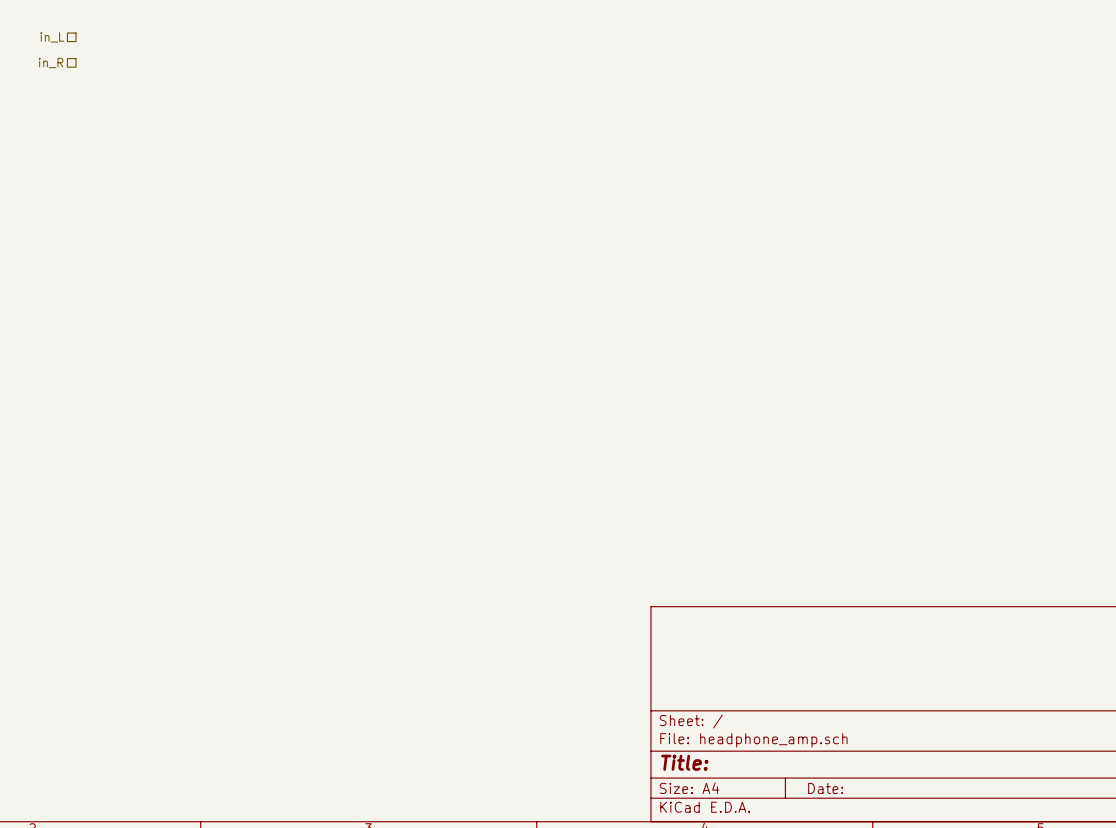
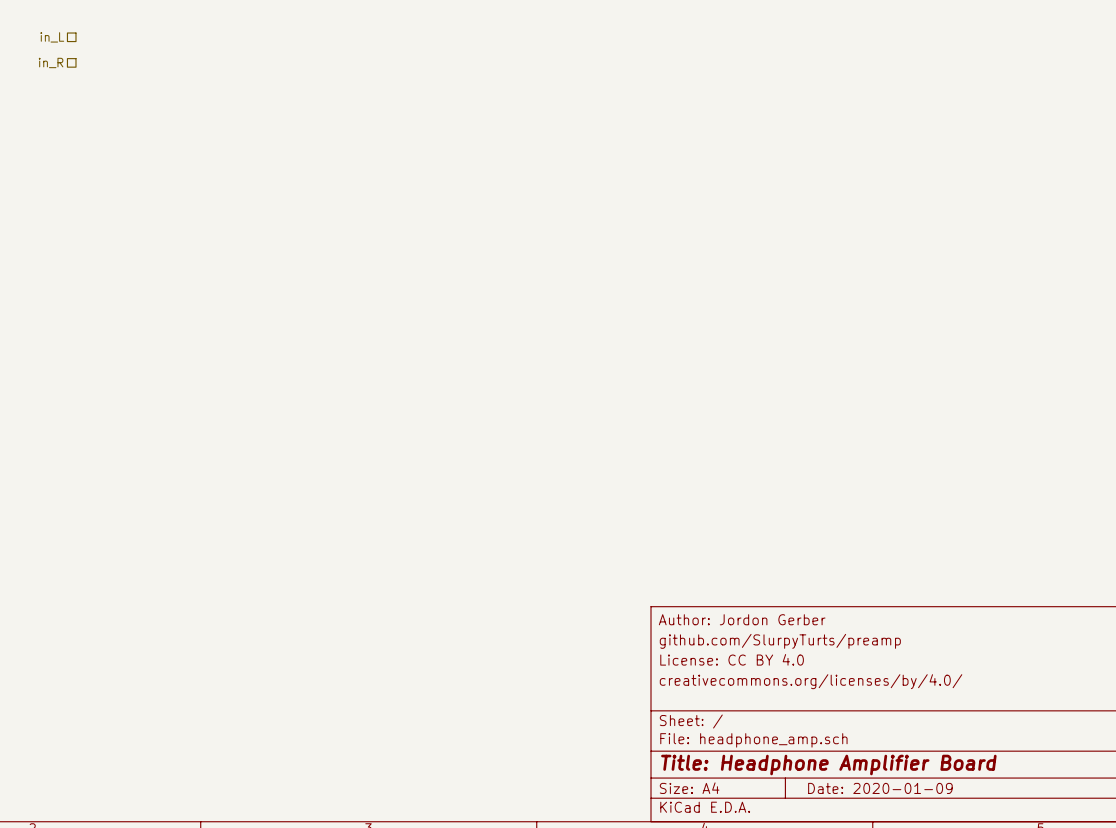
title block: none -> Author: Jordon Gerber (742, 619)
title block: none -> github.com/SlurpyTurts/preamp (780, 641)
title block: none -> License: CC BY 4.0 (732, 659)
title block: none -> creativecommons.org/licenses/by/4.0/ (811, 681)
title block: Title: (684, 762) -> Title: Headphone Amplifier Board (828, 765)
title block: Date: (825, 788) -> Date: 2020-01-09 (880, 788)

